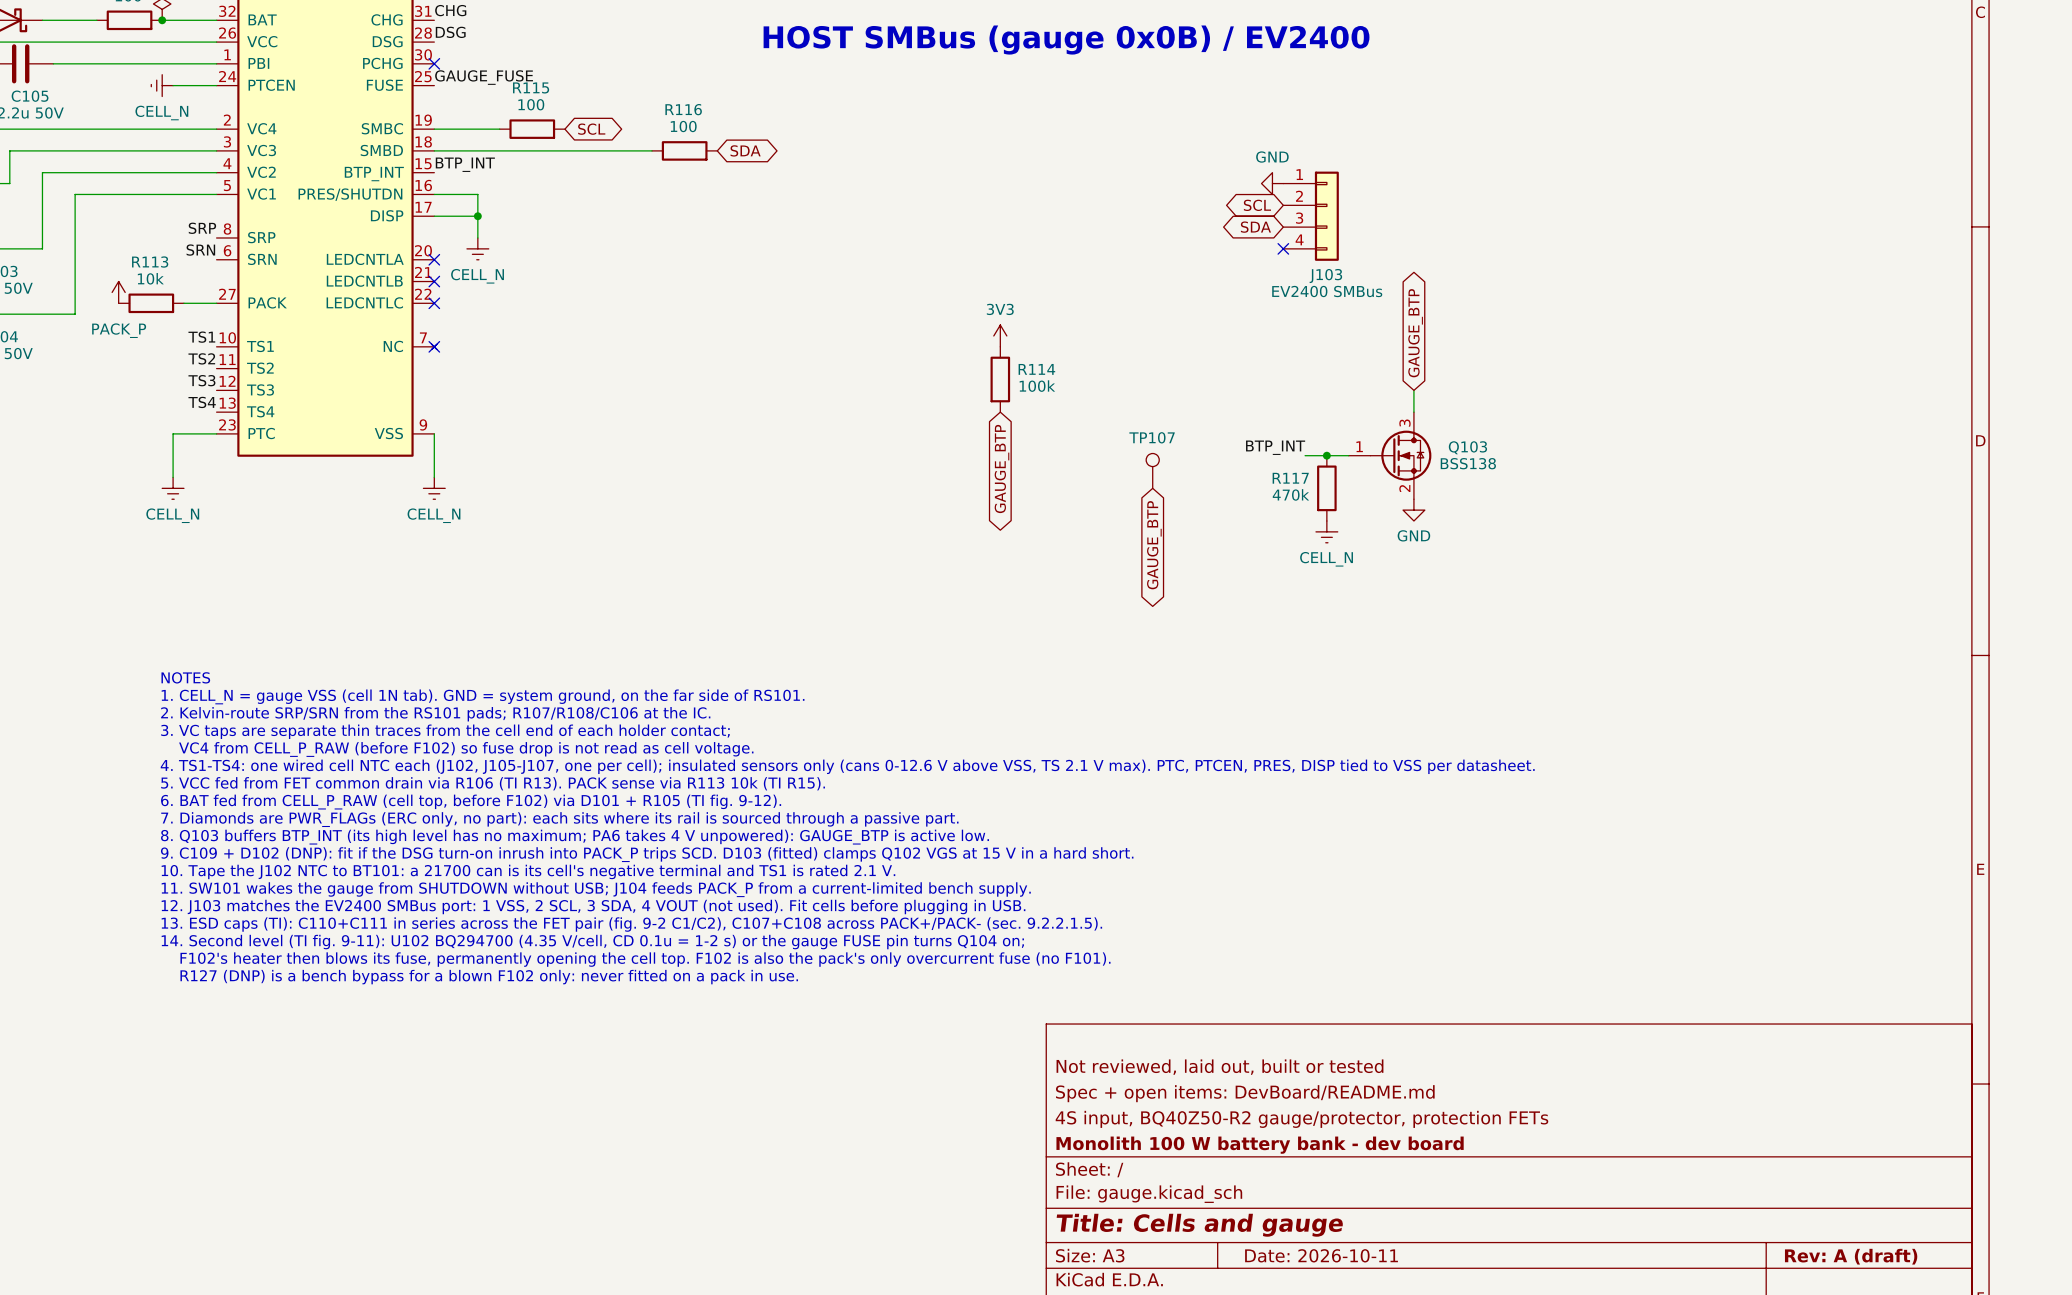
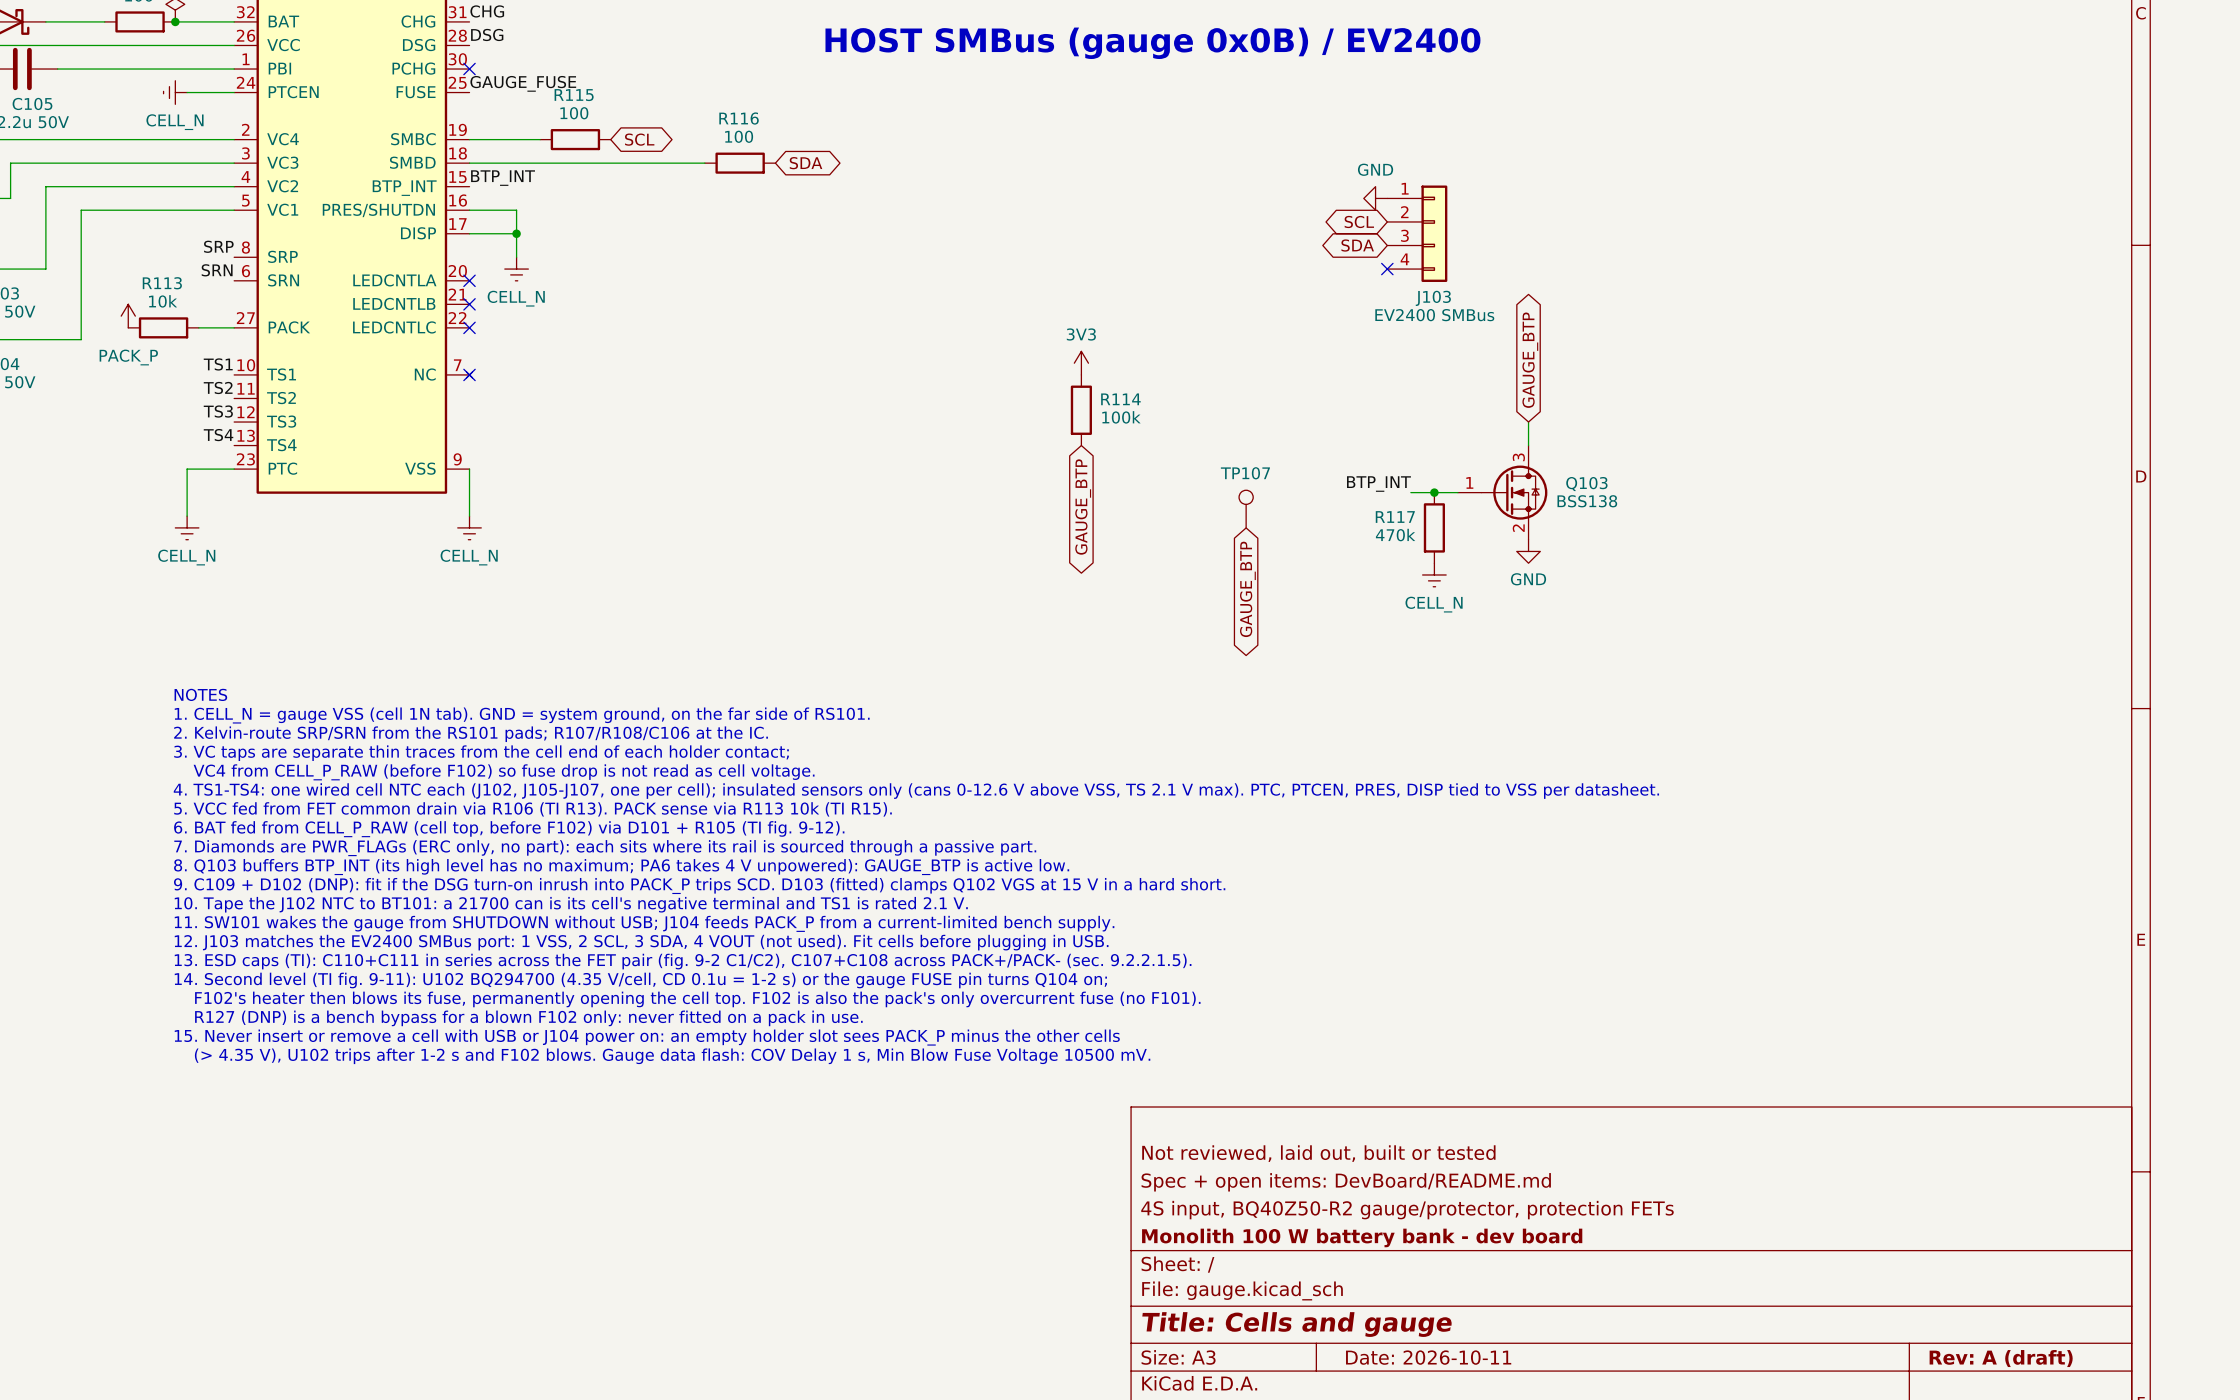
text: none -> NOTES (200, 694)
text: none -> 1. CELL_N = gauge VSS (cell 1N tab). GND = system ground, on the far side of RS101. (522, 715)
text: NOTES (185, 677) -> 2. Kelvin-route SRP/SRN from the RS101 pads; R107/R108/C106 at the IC. (471, 734)
text: 1. CELL_N = gauge VSS (cell 1N tab). GND = system ground, on the far side of RS101. (483, 696) -> 3. VC taps are separate thin traces from the cell end of each holder contact; (481, 753)
text: 2. Kelvin-route SRP/SRN from the RS101 pads; R107/R108/C106 at the IC. (435, 714) -> VC4 from CELL_P_RAW (before F102) so fuse drop is not read as cell voltage. (504, 772)
text: 3. VC taps are separate thin traces from the cell end of each holder contact; (445, 731) -> 4. TS1-TS4: one wired cell NTC each (J102, J105-J107, one per cell); insulated sensors only (cans 0-12.6 V above VSS, TS 2.1 V max). PTC, PTCEN, PRES, DISP tied to VSS per datasheet. (916, 791)
text: VC4 from CELL_P_RAW (before F102) so fuse drop is not read as cell voltage. (466, 749) -> 5. VCC fed from FET common drain via R106 (TI R13). PACK sense via R113 10k (TI R15). (533, 809)
text: 4. TS1-TS4: one wired cell NTC each (J102, J105-J107, one per cell); insulated sensors only (cans 0-12.6 V above VSS, TS 2.1 V max). PTC, PTCEN, PRES, DISP tied to VSS per datasheet. (847, 766) -> 6. BAT fed from CELL_P_RAW (cell top, before F102) via D101 + R105 (TI fig. 9-12). (509, 829)
text: 5. VCC fed from FET common drain via R106 (TI R13). PACK sense via R113 10k (TI R15). (493, 783) -> 7. Diamonds are PWR_FLAGs (ERC only, no part): each sits where its rail is sourced through a passive part. (605, 848)
text: 6. BAT fed from CELL_P_RAW (cell top, before F102) via D101 + R105 (TI fig. 9-12). (471, 802) -> 8. Q103 buffers BTP_INT (its high level has no maximum; PA6 takes 4 V unpowered): GAUGE_BTP is active low. (621, 867)
text: 7. Diamonds are PWR_FLAGs (ERC only, no part): each sits where its rail is sourced through a passive part. (559, 819) -> 9. C109 + D102 (DNP): fit if the DSG turn-on inrush into PACK_P trips SCD. D103 (fitted) clamps Q102 VGS at 15 V in a hard short. (699, 886)
text: 8. Q103 buffers BTP_INT (its high level has no maximum; PA6 takes 4 V unpowered): GAUGE_BTP is active low. (575, 837) -> 10. Tape the J102 NTC to BT101: a 21700 can is its cell's negative terminal and TS1 is rated 2.1 V. (571, 904)
text: 9. C109 + D102 (DNP): fit if the DSG turn-on inrush into PACK_P trips SCD. D103 (fitted) clamps Q102 VGS at 15 V in a hard short. (647, 854) -> 11. SW101 wakes the gauge from SHUTDOWN without USB; J104 feeds PACK_P from a current-limited bench supply. (644, 923)
text: 10. Tape the J102 NTC to BT101: a 21700 can is its cell's negative terminal and TS1 is rated 2.1 V. (528, 871) -> 12. J103 matches the EV2400 SMBus port: 1 VSS, 2 SCL, 3 SDA, 4 VOUT (not used). Fit cells before plugging in USB. (641, 942)
text: 11. SW101 wakes the gauge from SHUTDOWN without USB; J104 feeds PACK_P from a current-limited bench supply. (596, 889) -> 13. ESD caps (TI): C110+C111 in series across the FET pair (fig. 9-2 C1/C2), C107+C108 across PACK+/PACK- (sec. 9.2.2.1.5). (683, 961)
text: 12. J103 matches the EV2400 SMBus port: 1 VSS, 2 SCL, 3 SDA, 4 VOUT (not used). Fit cells before plugging in USB. (593, 907) -> 14. Second level (TI fig. 9-11): U102 BQ294700 (4.35 V/cell, CD 0.1u = 1-2 s) or the gauge FUSE pin turns Q104 on; (640, 980)
text: 13. ESD caps (TI): C110+C111 in series across the FET pair (fig. 9-2 C1/C2), C107+C108 across PACK+/PACK- (sec. 9.2.2.1.5). (631, 924) -> F102's heater then blows its fuse, permanently opening the cell top. F102 is also the pack's only overcurrent fuse (no F101). (697, 999)
text: 14. Second level (TI fig. 9-11): U102 BQ294700 (4.35 V/cell, CD 0.1u = 1-2 s) or the gauge FUSE pin turns Q104 on; (592, 942) -> R127 (DNP) is a bench bypass for a blown F102 only: never fitted on a pack in use. (528, 1018)
text: F102's heater then blows its fuse, permanently opening the cell top. F102 is also the pack's only overcurrent fuse (no F101). (645, 959) -> 15. Never insert or remove a cell with USB or J104 power on: an empty holder slot sees PACK_P minus the other cells (647, 1037)
text: R127 (DNP) is a bench bypass for a blown F102 only: never fitted on a pack in use. (489, 977) -> (> 4.35 V), U102 trips after 1-2 s and F102 blows. Gauge data flash: COV Delay 1 s, Min Blow Fuse Voltage 10500 mV. (672, 1056)

